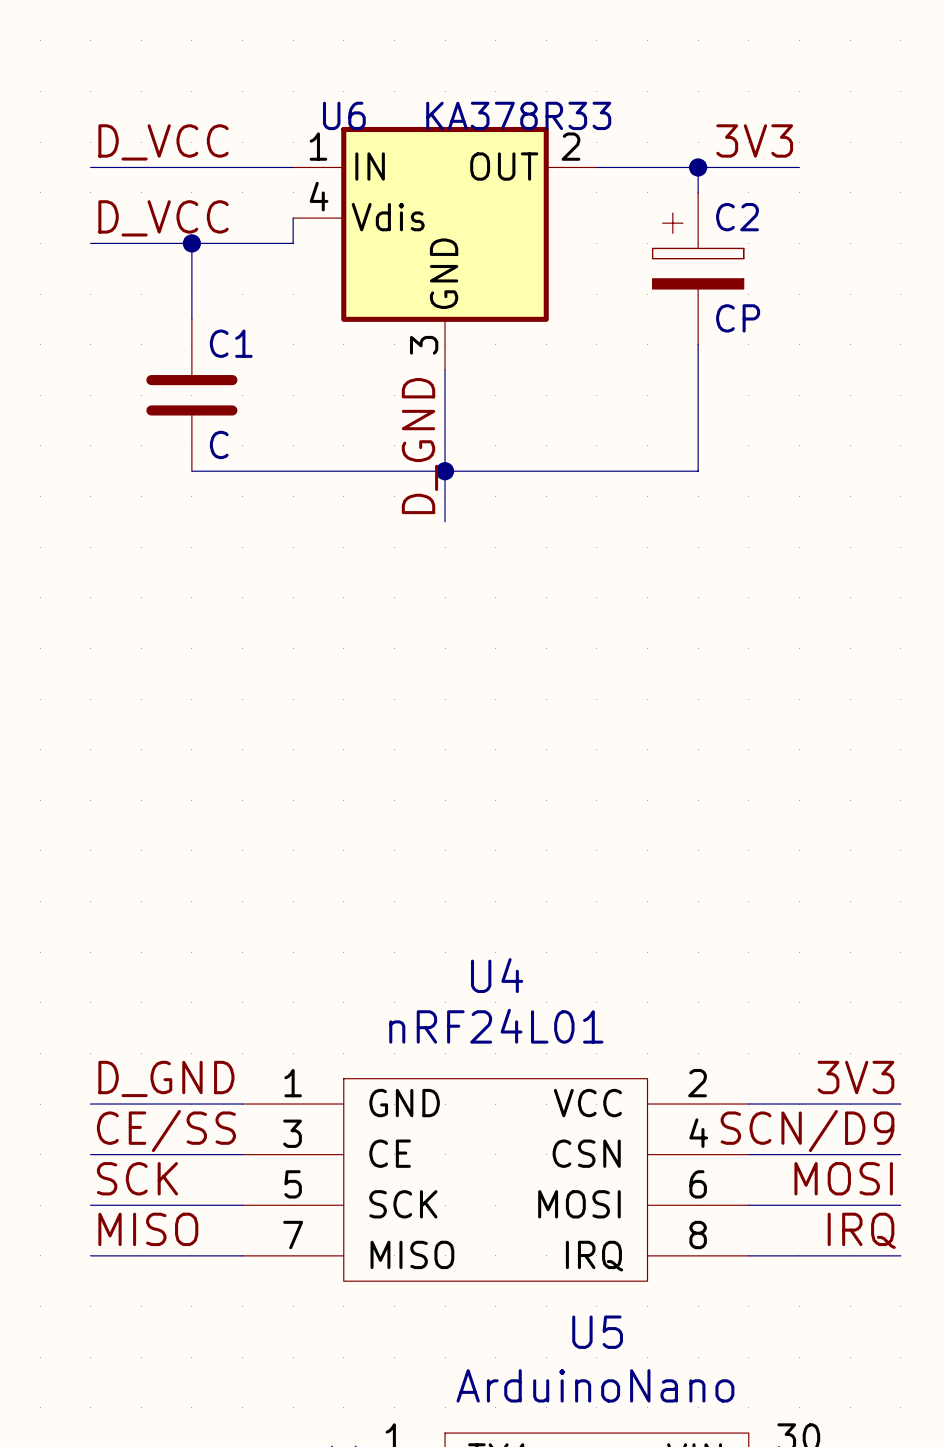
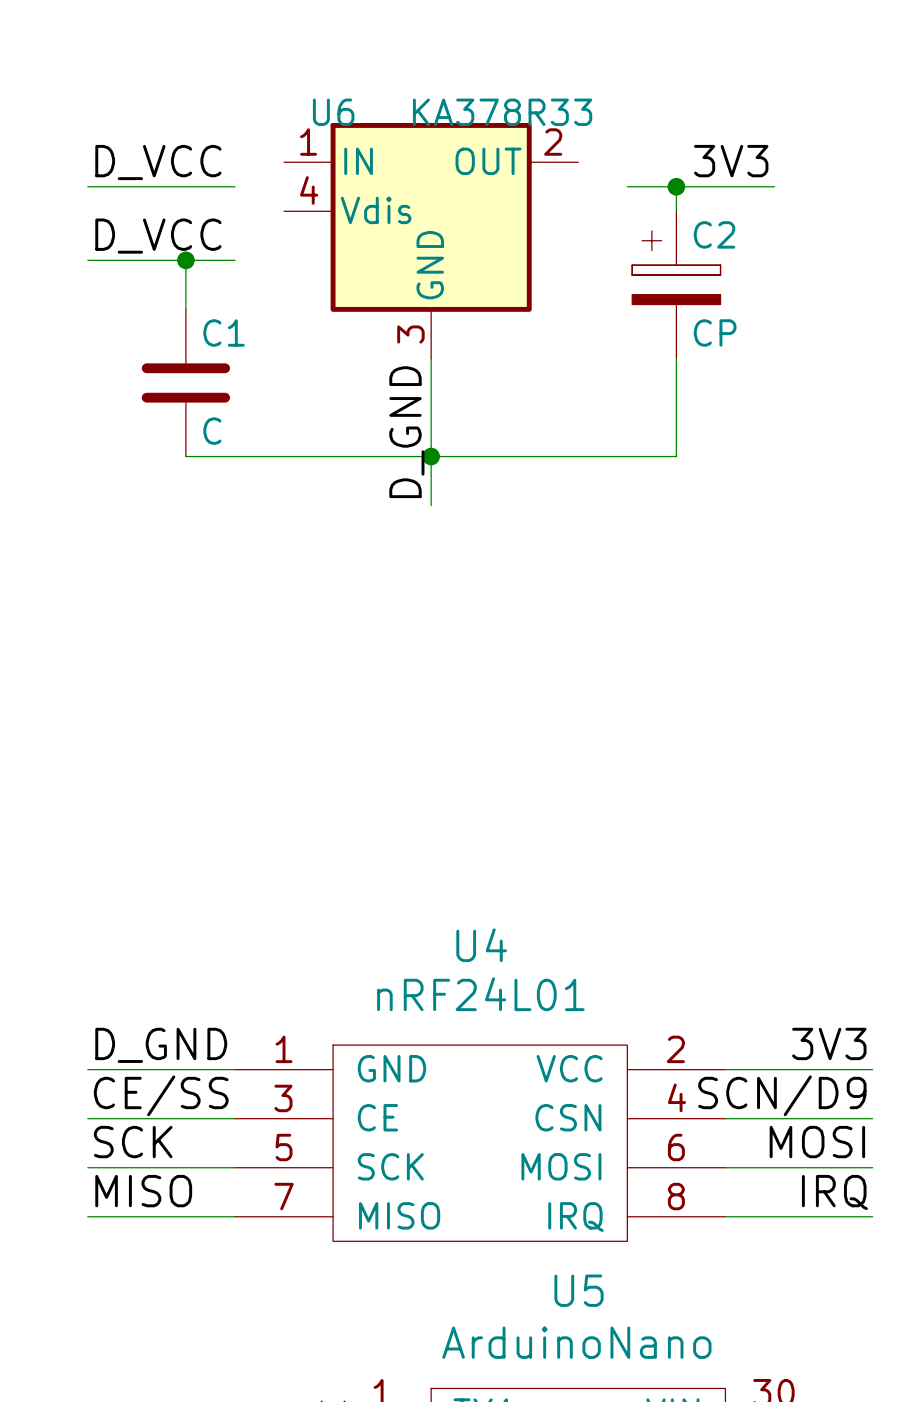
label position: 3V3 (754, 140) -> 3V3 (731, 161)
label: D_VCC (163, 142) -> none
wire: (90, 167) (293, 167) -> none
label: none -> D_VCC (158, 162)
wire: (596, 167) (799, 167) -> none
junction position: (698, 167) -> (676, 186)
wire: none -> (87, 186) (234, 186)
wire: none -> (627, 186) (774, 186)
label: D_VCC (163, 218) -> none
wire: (293, 218) (293, 243) (90, 243) -> none
label: none -> D_VCC (158, 236)
wire: (191, 243) (191, 268) -> none
junction position: (191, 243) -> (185, 260)
wire: none -> (87, 260) (234, 260)
C2 position: (698, 268) -> (676, 284)

